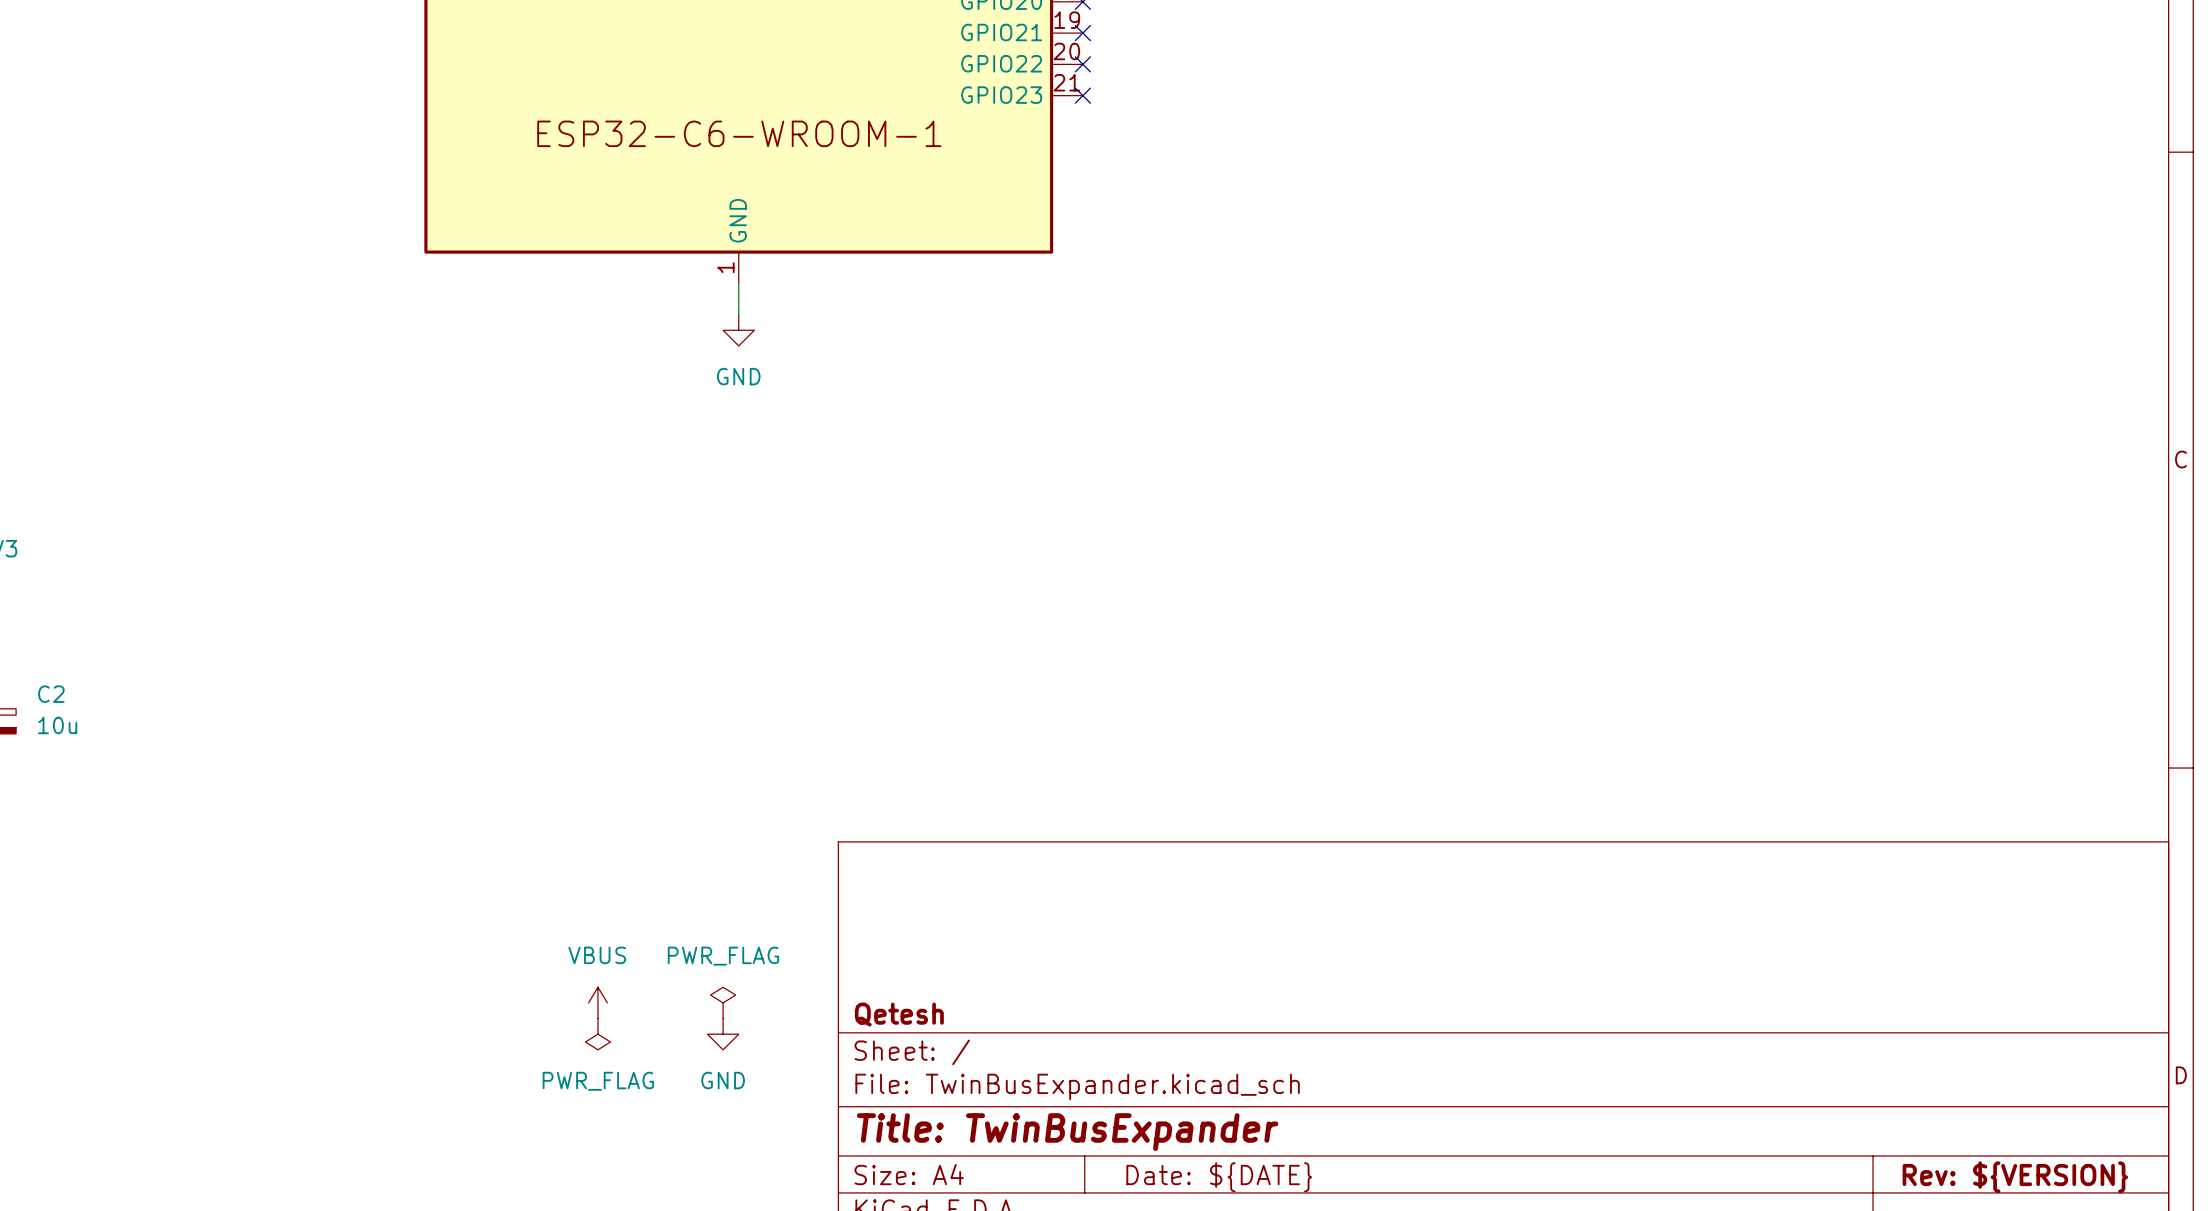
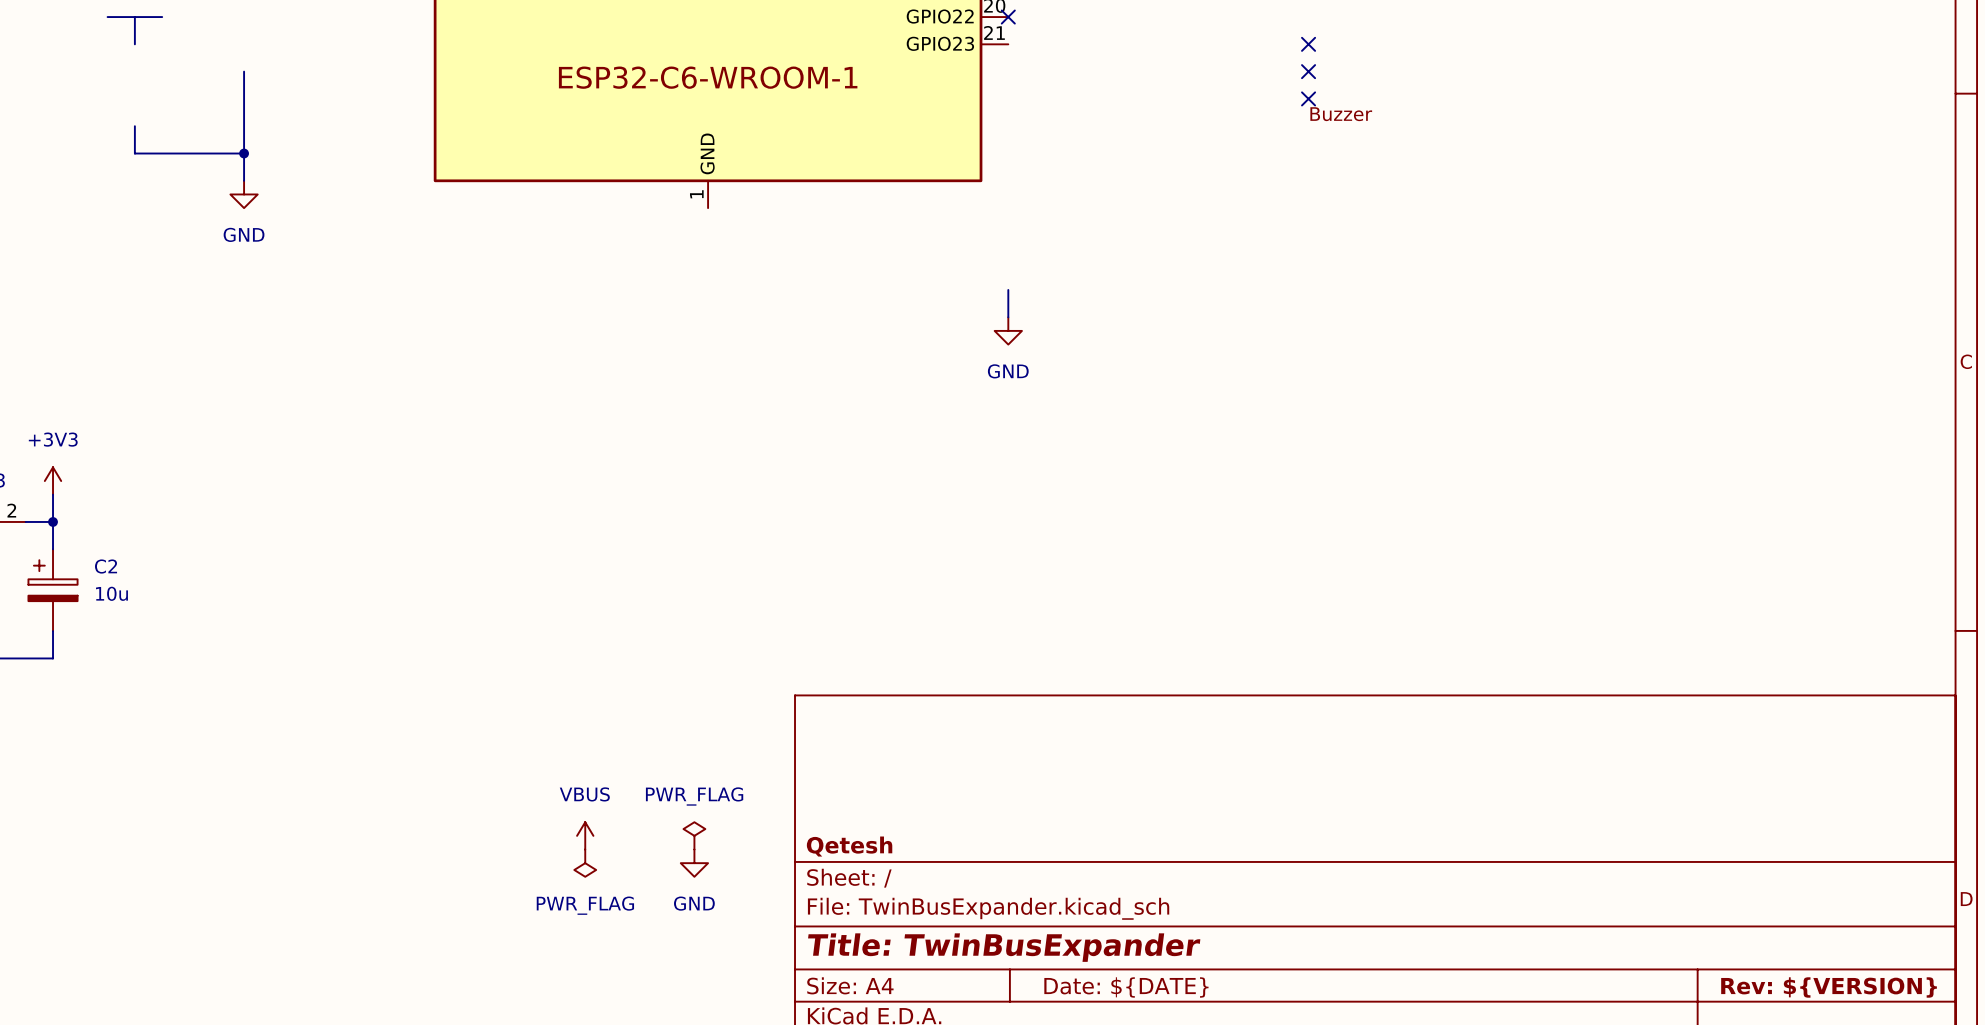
wire: none -> (107, 17) (162, 17)
wire: none -> (134, 17) (134, 44)
no-connect mark: (1082, 95) -> none
no-connect mark: none -> (1308, 44)
wire: none -> (244, 71) (244, 180)
no-connect mark: none -> (1308, 71)
no-connect mark: none -> (1308, 98)
label: none -> Buzzer (1341, 114)
wire: none -> (134, 126) (134, 153) (244, 153)
junction: none -> (244, 153)
power symbol: none -> GND (244, 194)
wire: (738, 283) (738, 314) -> none
power symbol: GND (738, 330) -> none
wire: none -> (1008, 289) (1008, 317)
power symbol: none -> GND (1008, 330)

